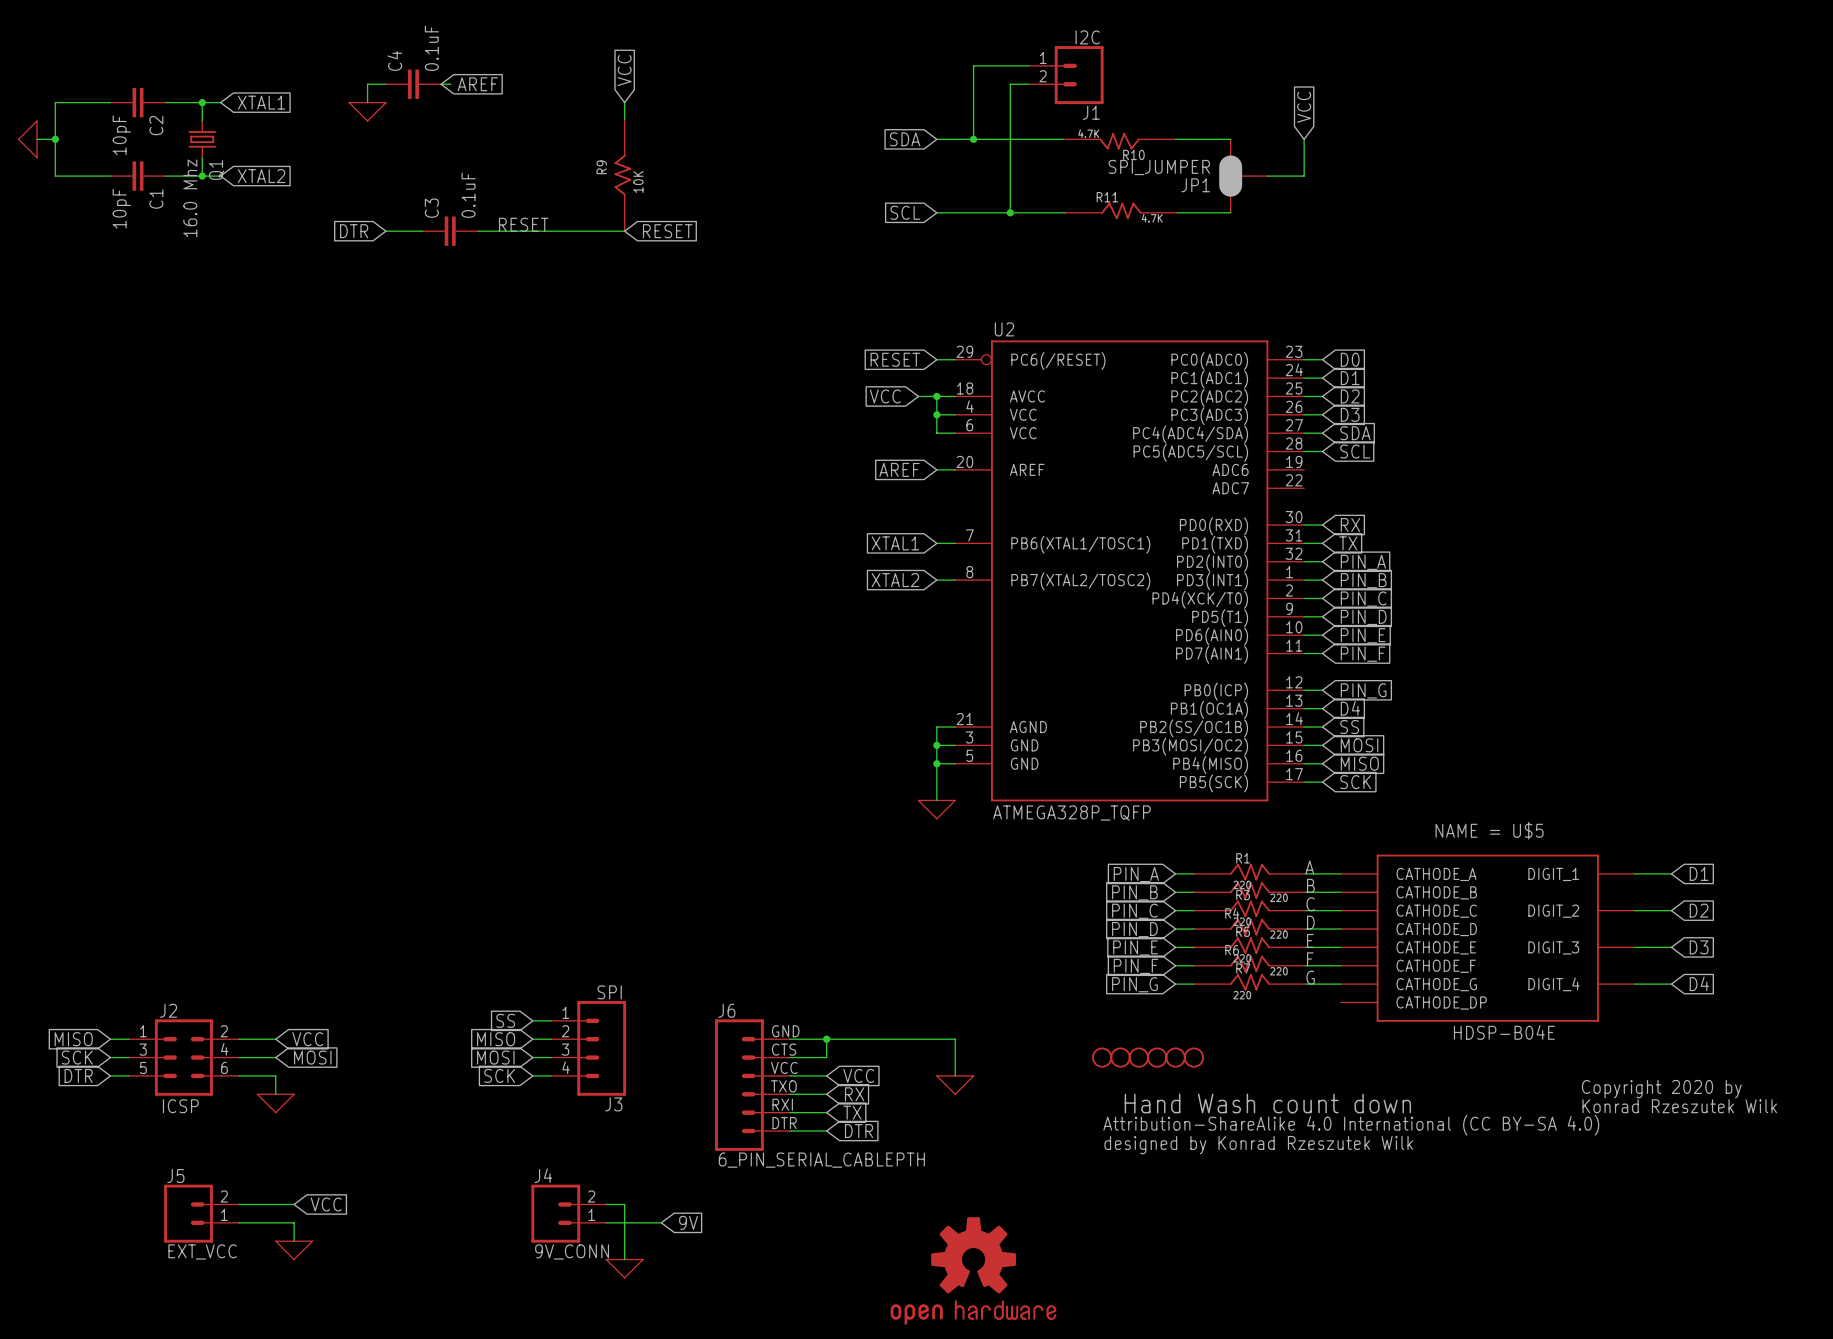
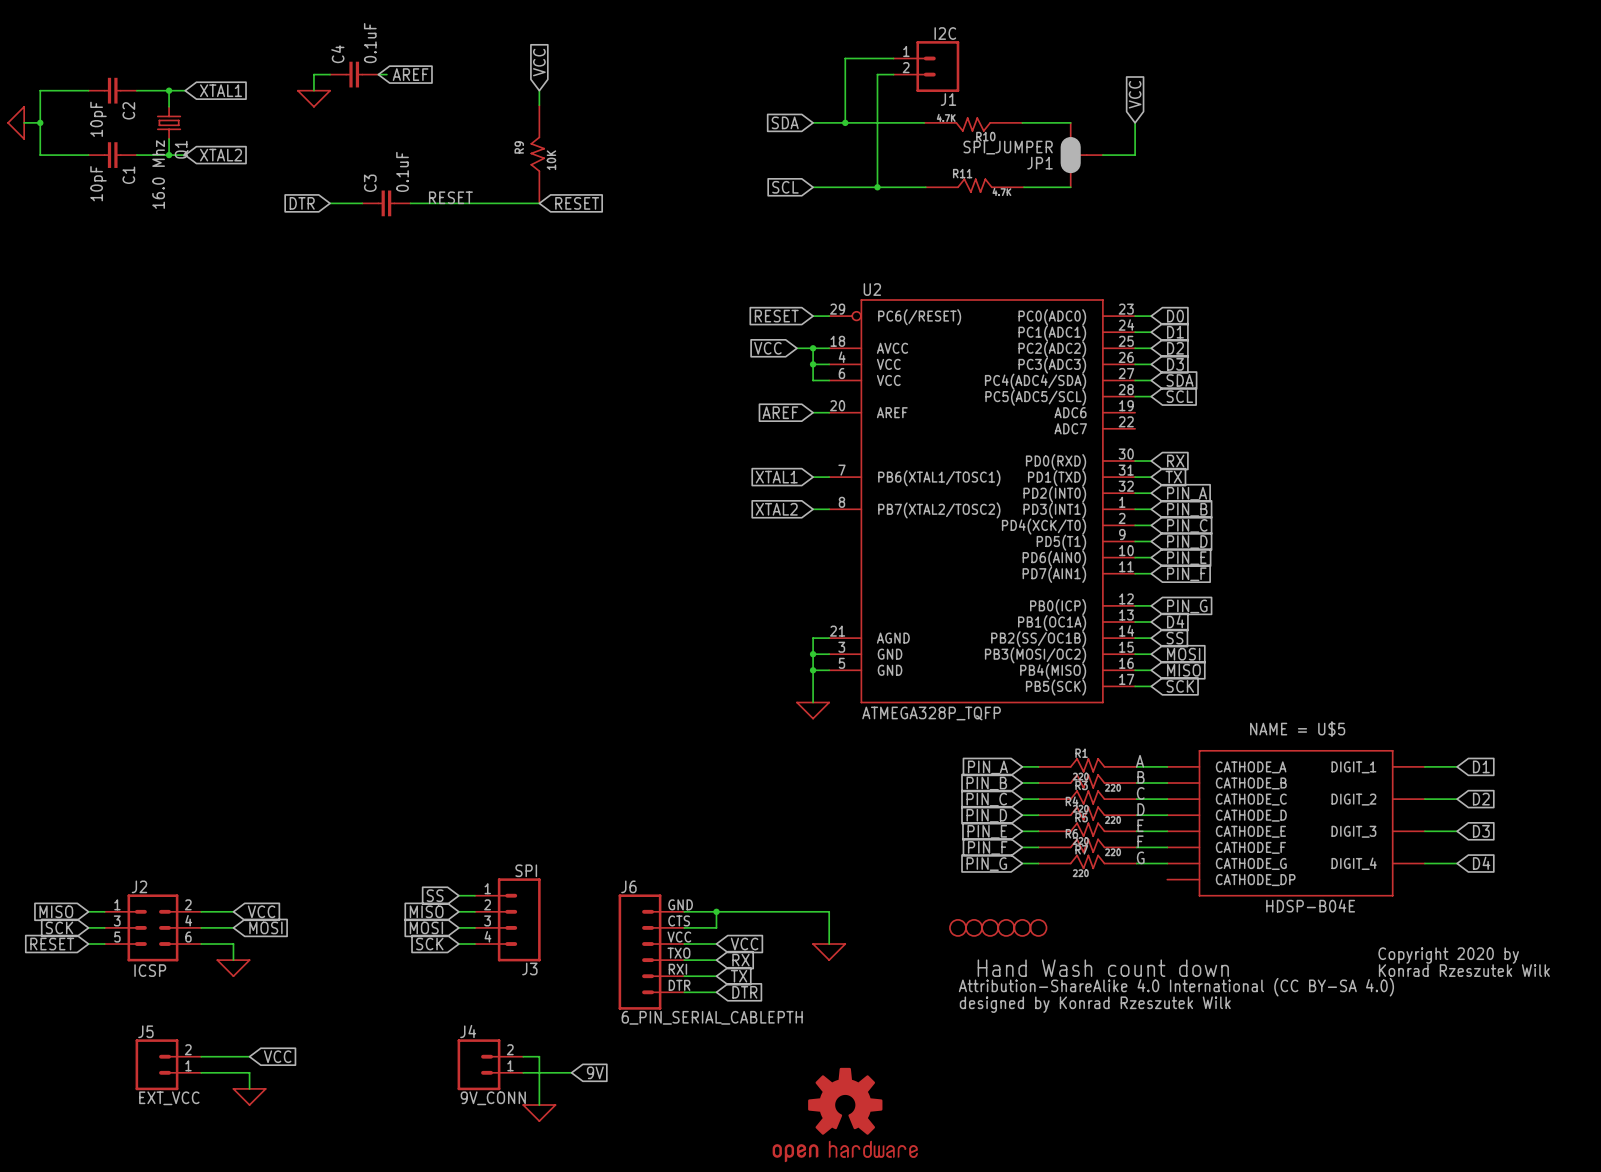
global label: DTR (78, 1075) -> RESET (52, 944)

